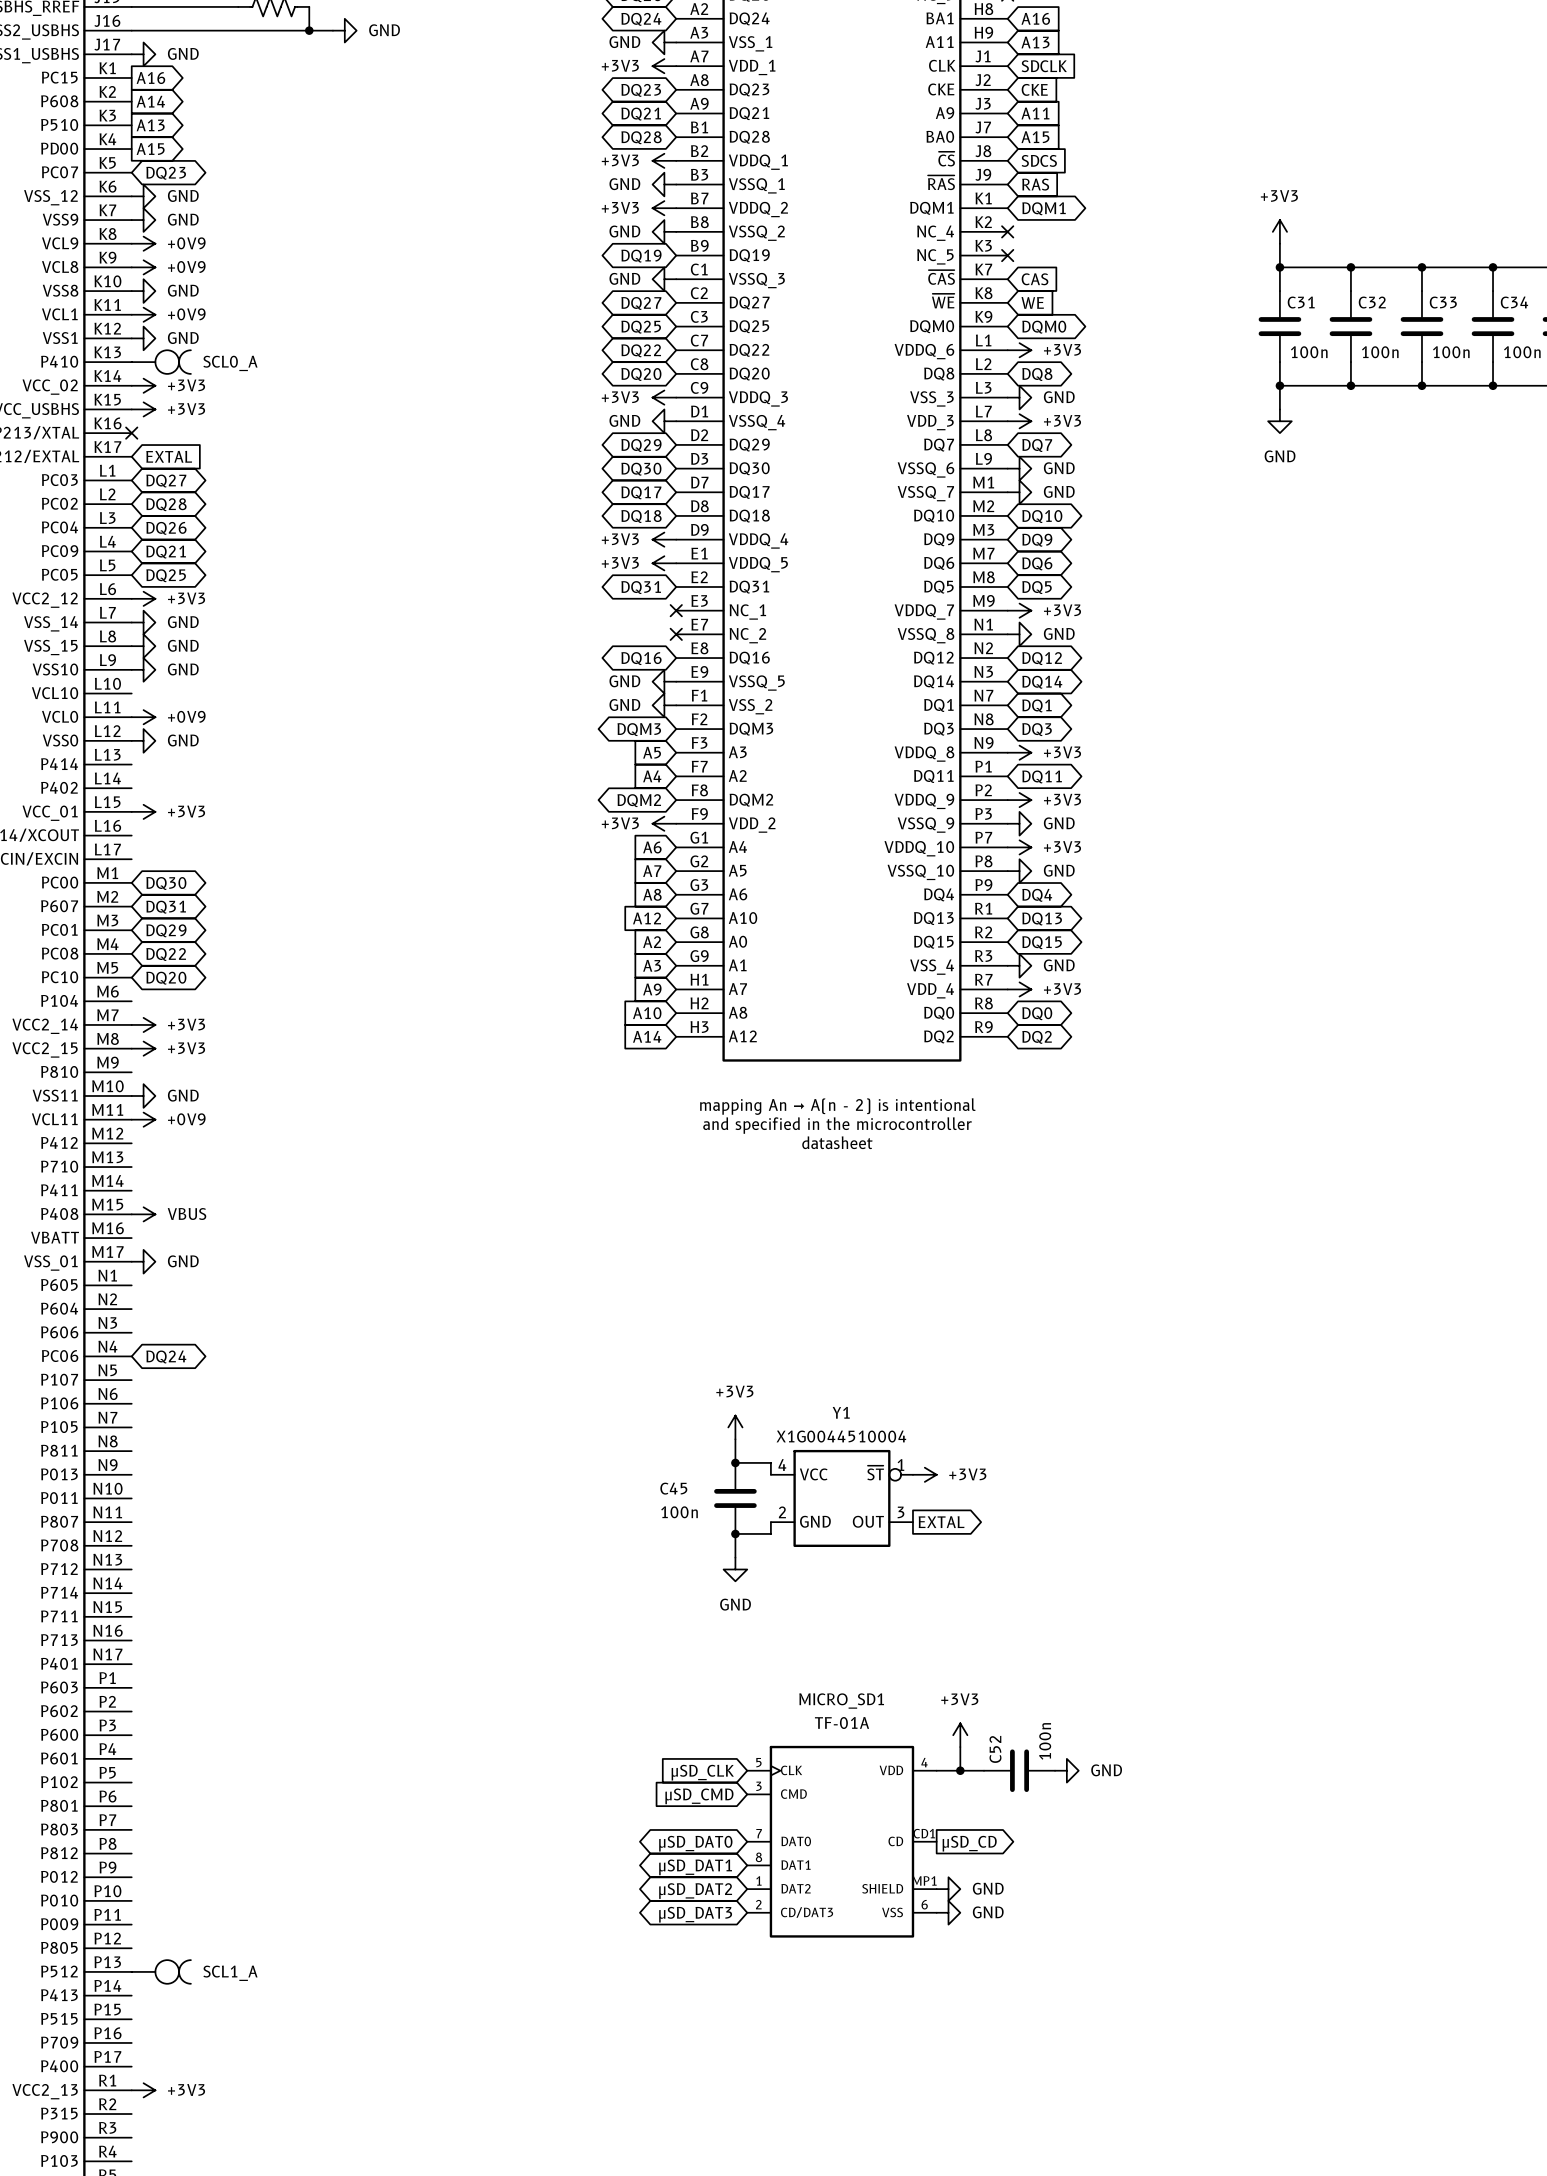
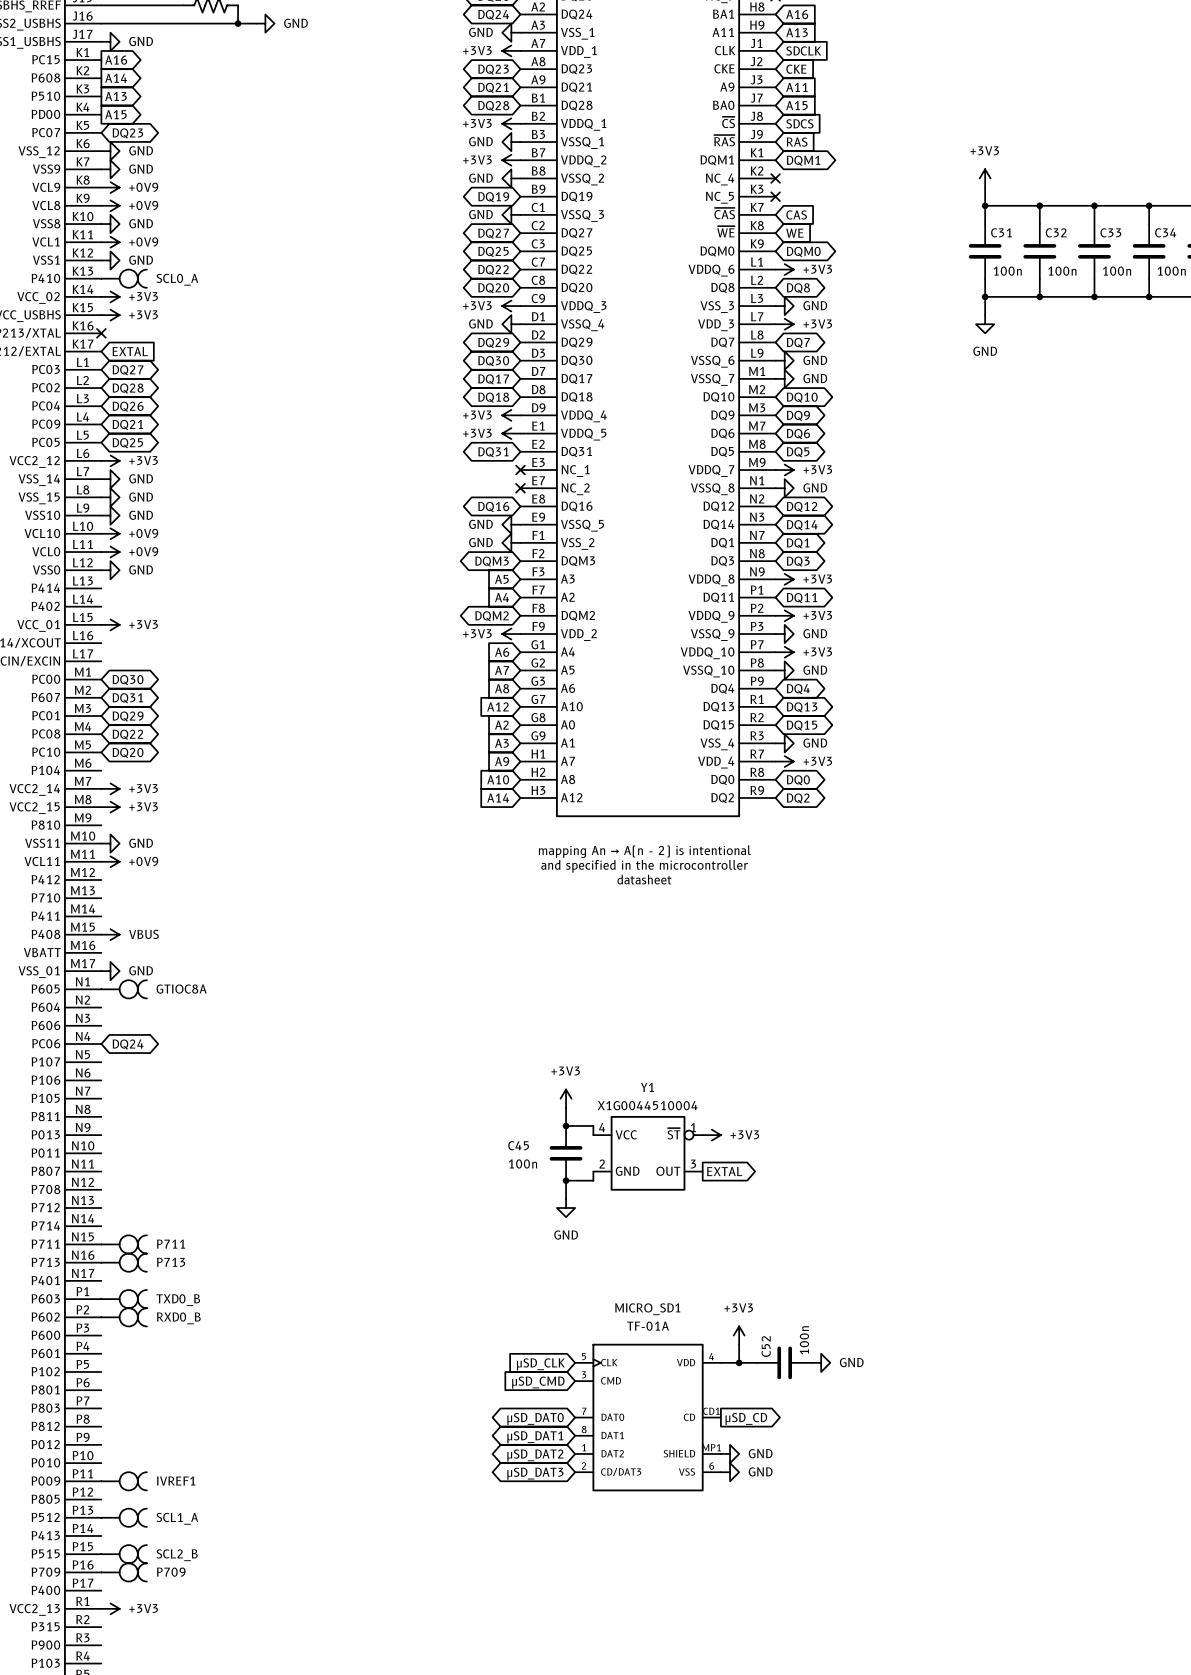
power symbol: none -> +0V9 (110, 533)
part: none -> GTIOC8A (124, 989)
part: none -> P711 (124, 1244)
part: none -> P713 (124, 1262)
part: none -> TXD0_B (124, 1299)
part: none -> RXD0_B (124, 1317)
part: none -> IVREF1 (124, 1481)
part: none -> SCL2_B (124, 1554)
part: none -> P709 (124, 1572)

